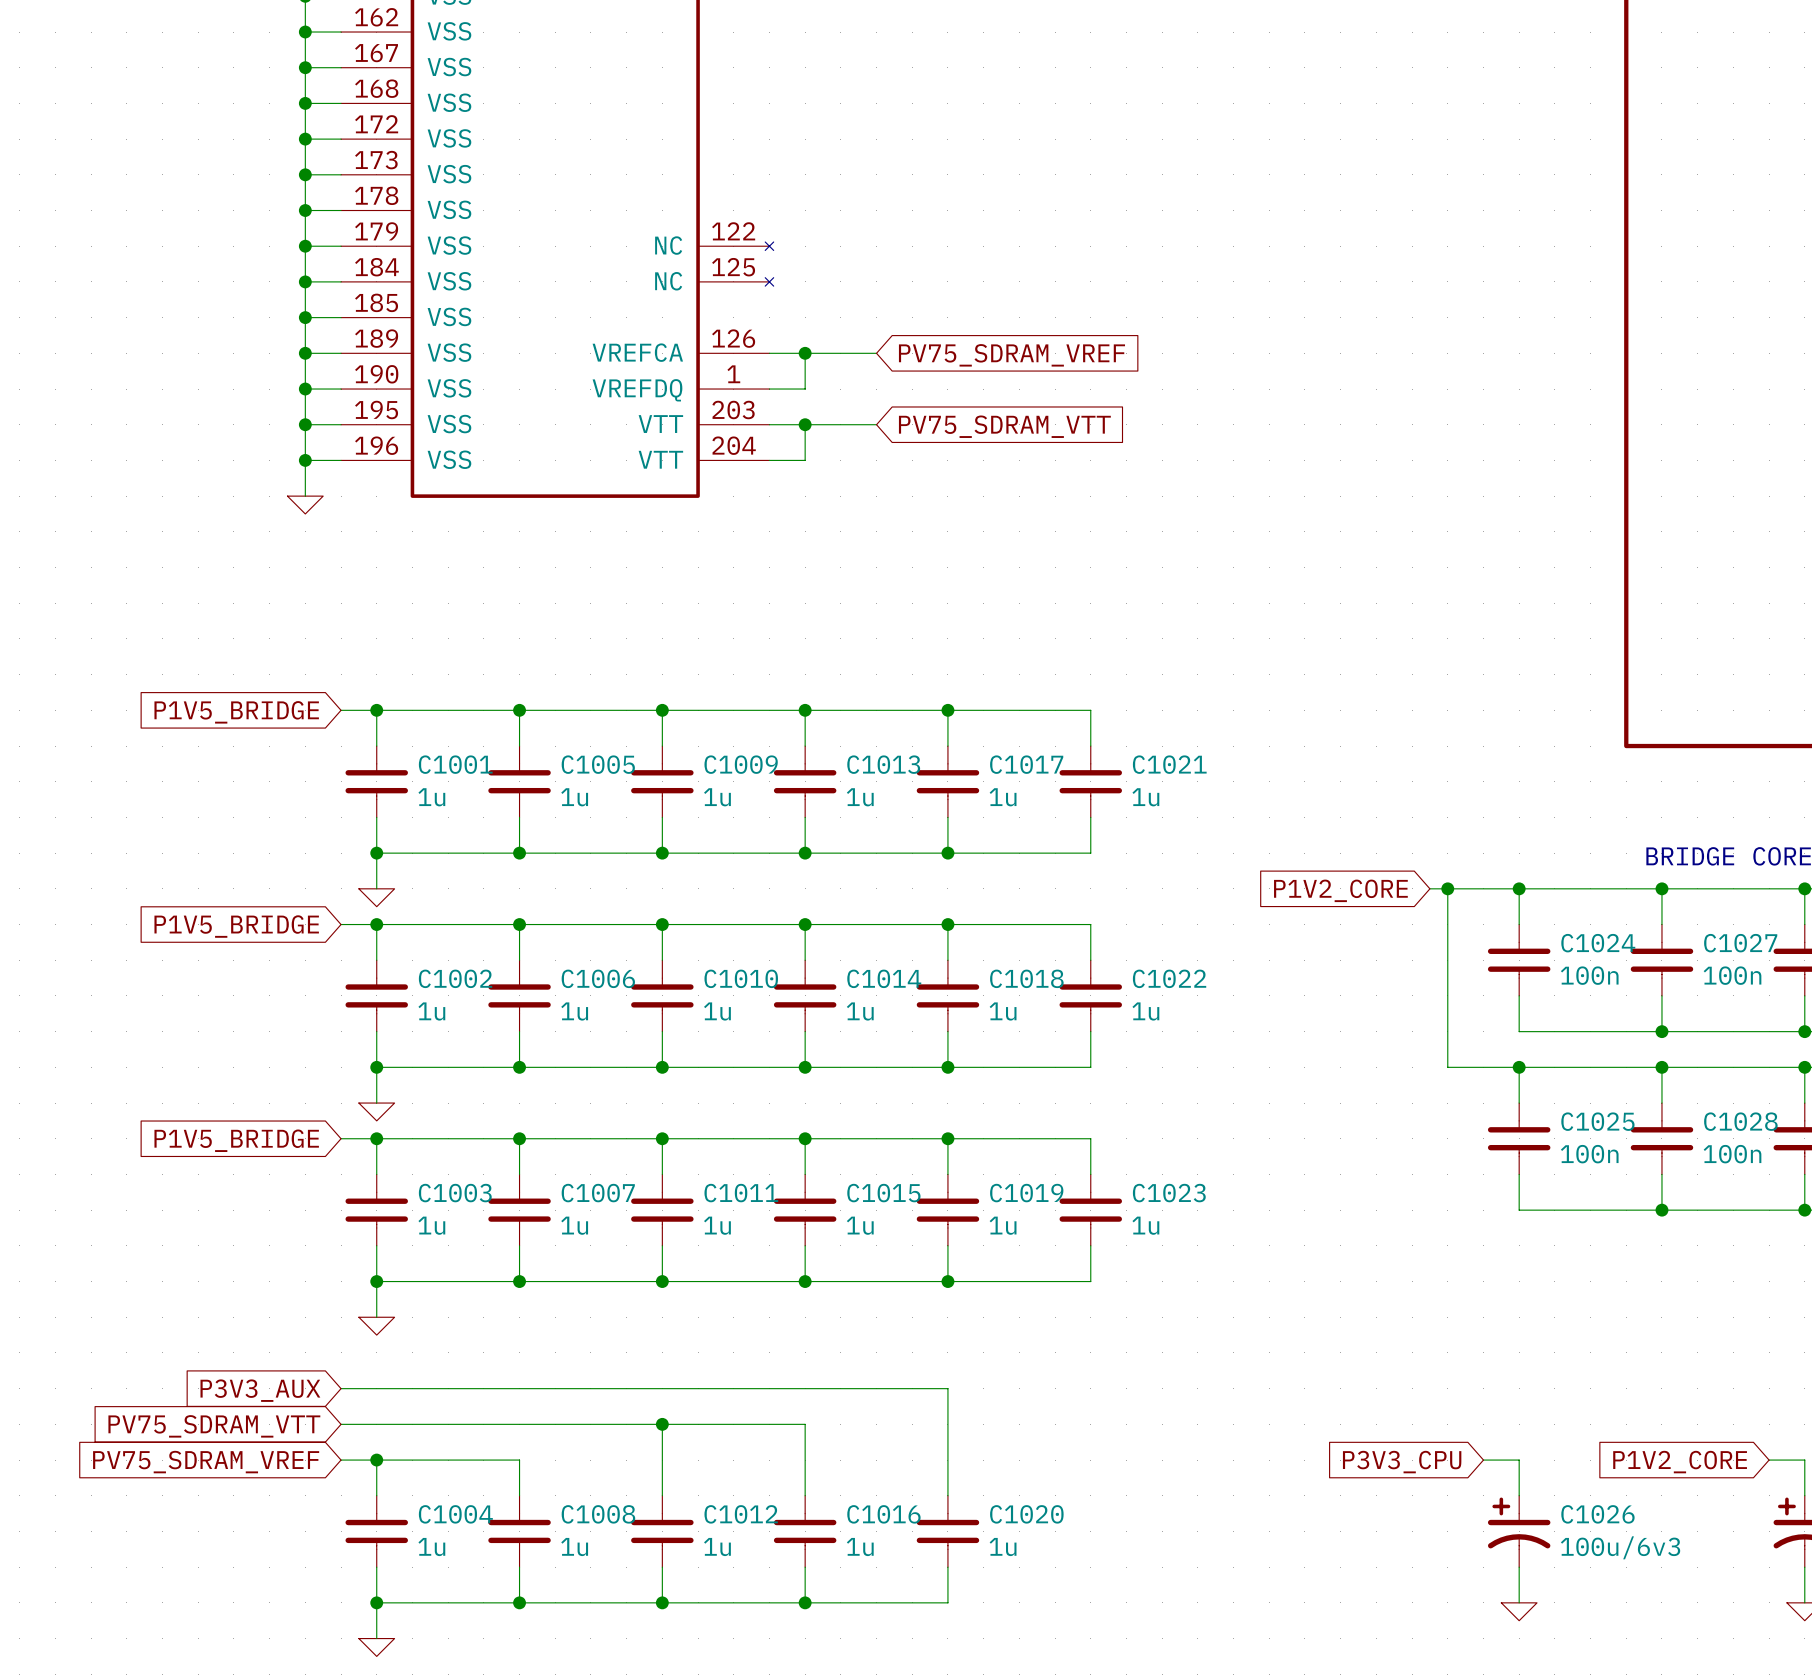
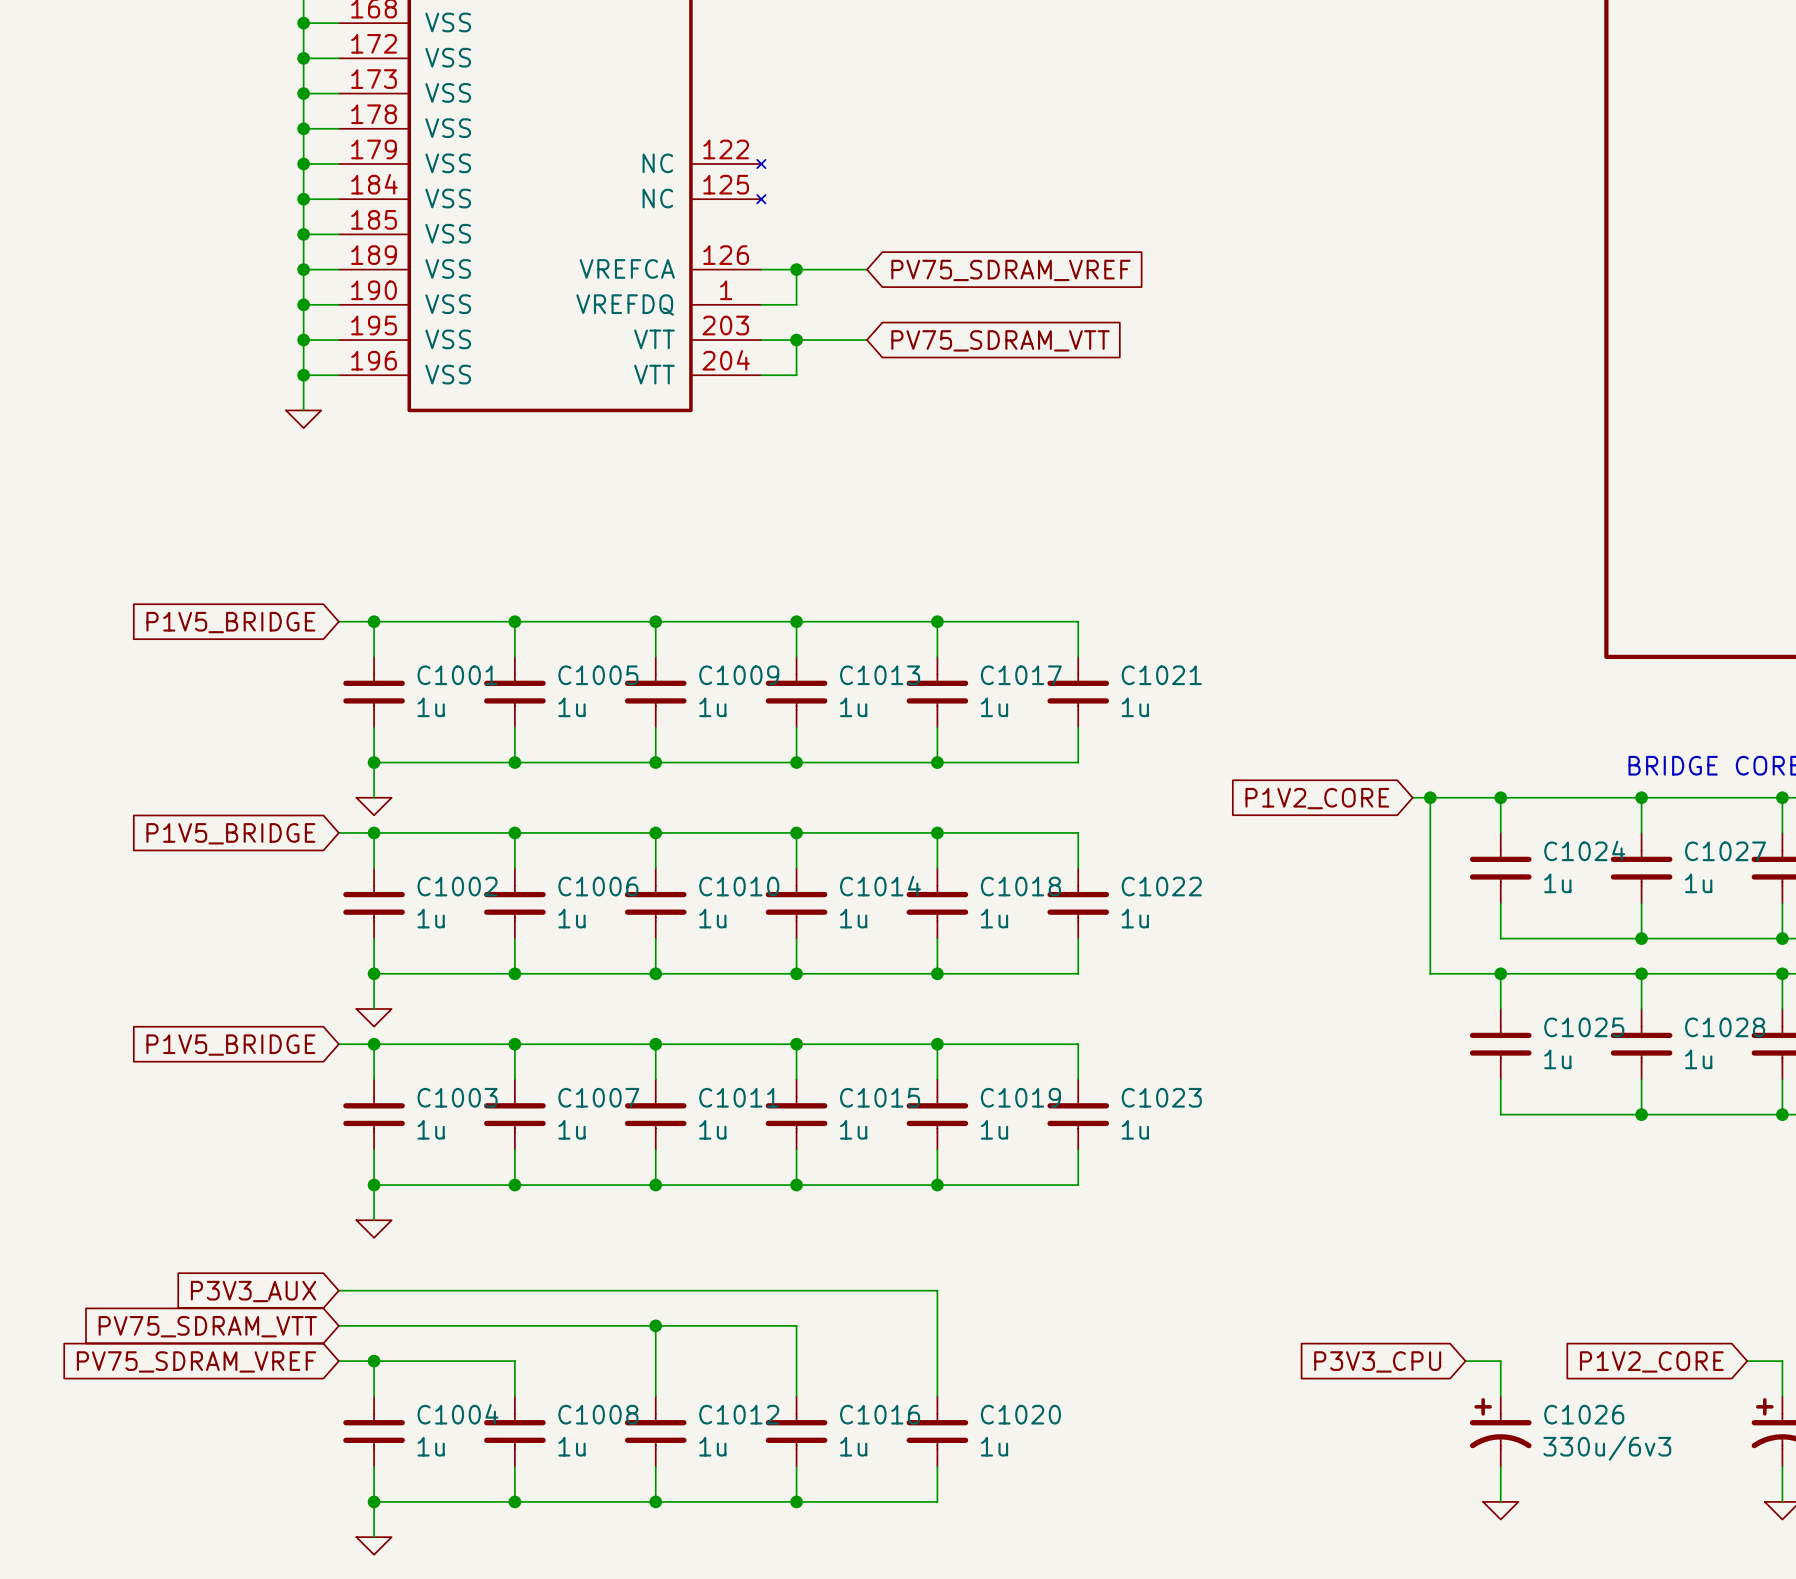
C1024 value: 100n (1589, 975) -> 1u (1557, 883)
C1027 value: 100n (1732, 975) -> 1u (1698, 883)
C1025 value: 100n (1589, 1154) -> 1u (1557, 1059)
C1028 value: 100n (1732, 1154) -> 1u (1698, 1059)
C1026 value: 100u/6v3 (1620, 1547) -> 330u/6v3 (1607, 1448)

